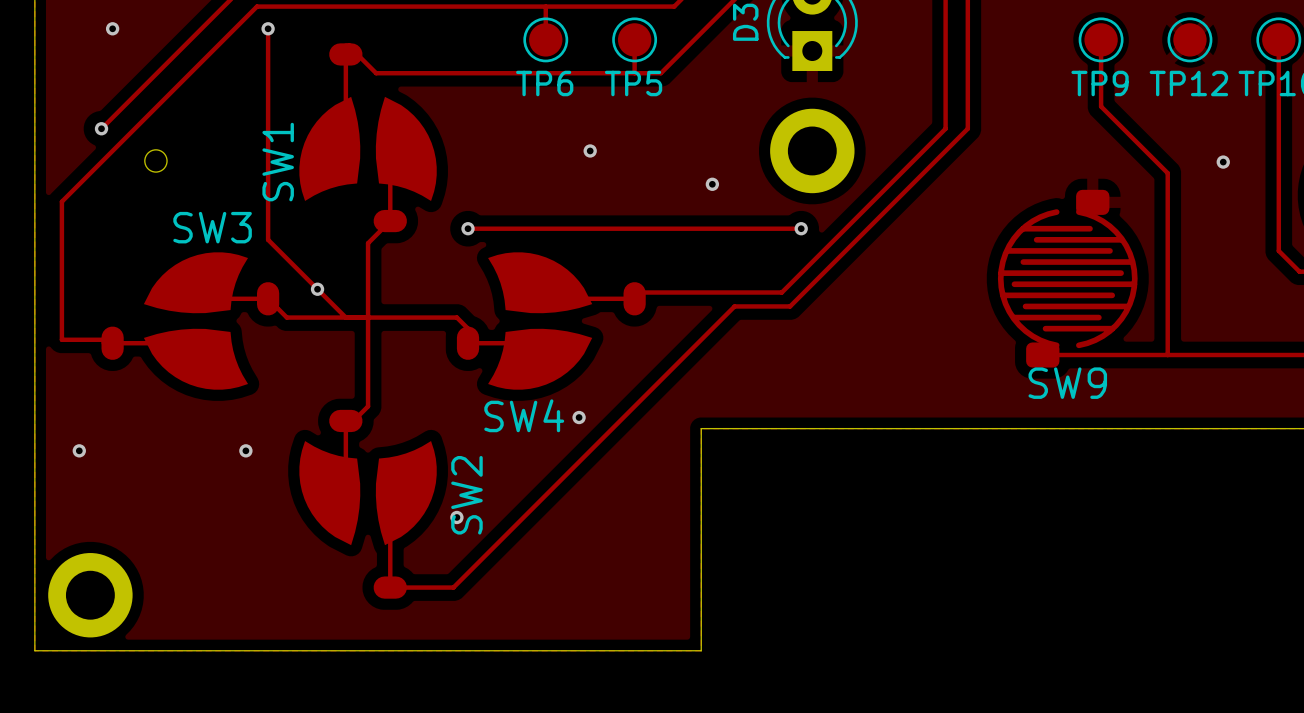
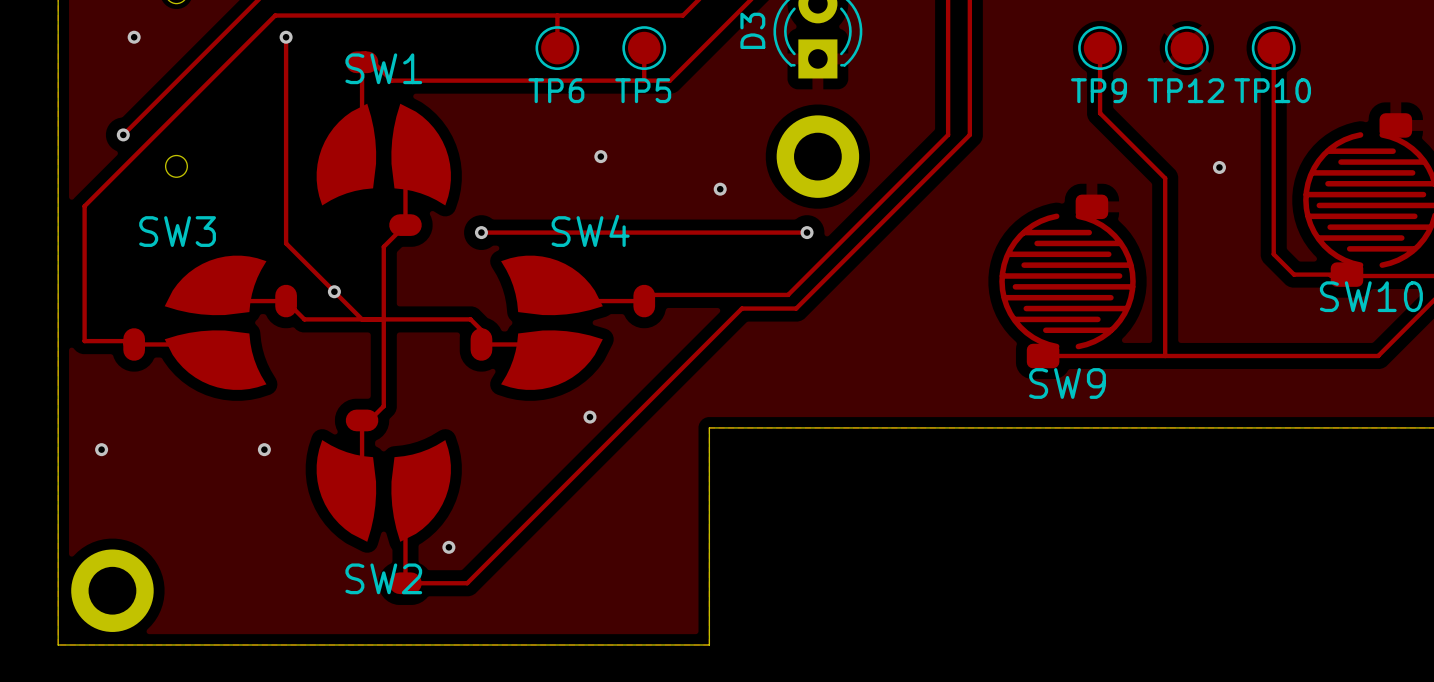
SW1 name rotation: 0° (278, 162) -> 90° clockwise (383, 68)
SW1 name position: SW1 (278, 162) -> SW1 (383, 68)
SW3 name position: SW3 (212, 227) -> SW3 (177, 231)
SW4 name position: SW4 (524, 415) -> SW4 (590, 230)
SW2 name rotation: 0° (466, 495) -> 90° clockwise (383, 578)
SW2 name position: SW2 (466, 495) -> SW2 (383, 578)
via position: (456, 517) -> (448, 547)

